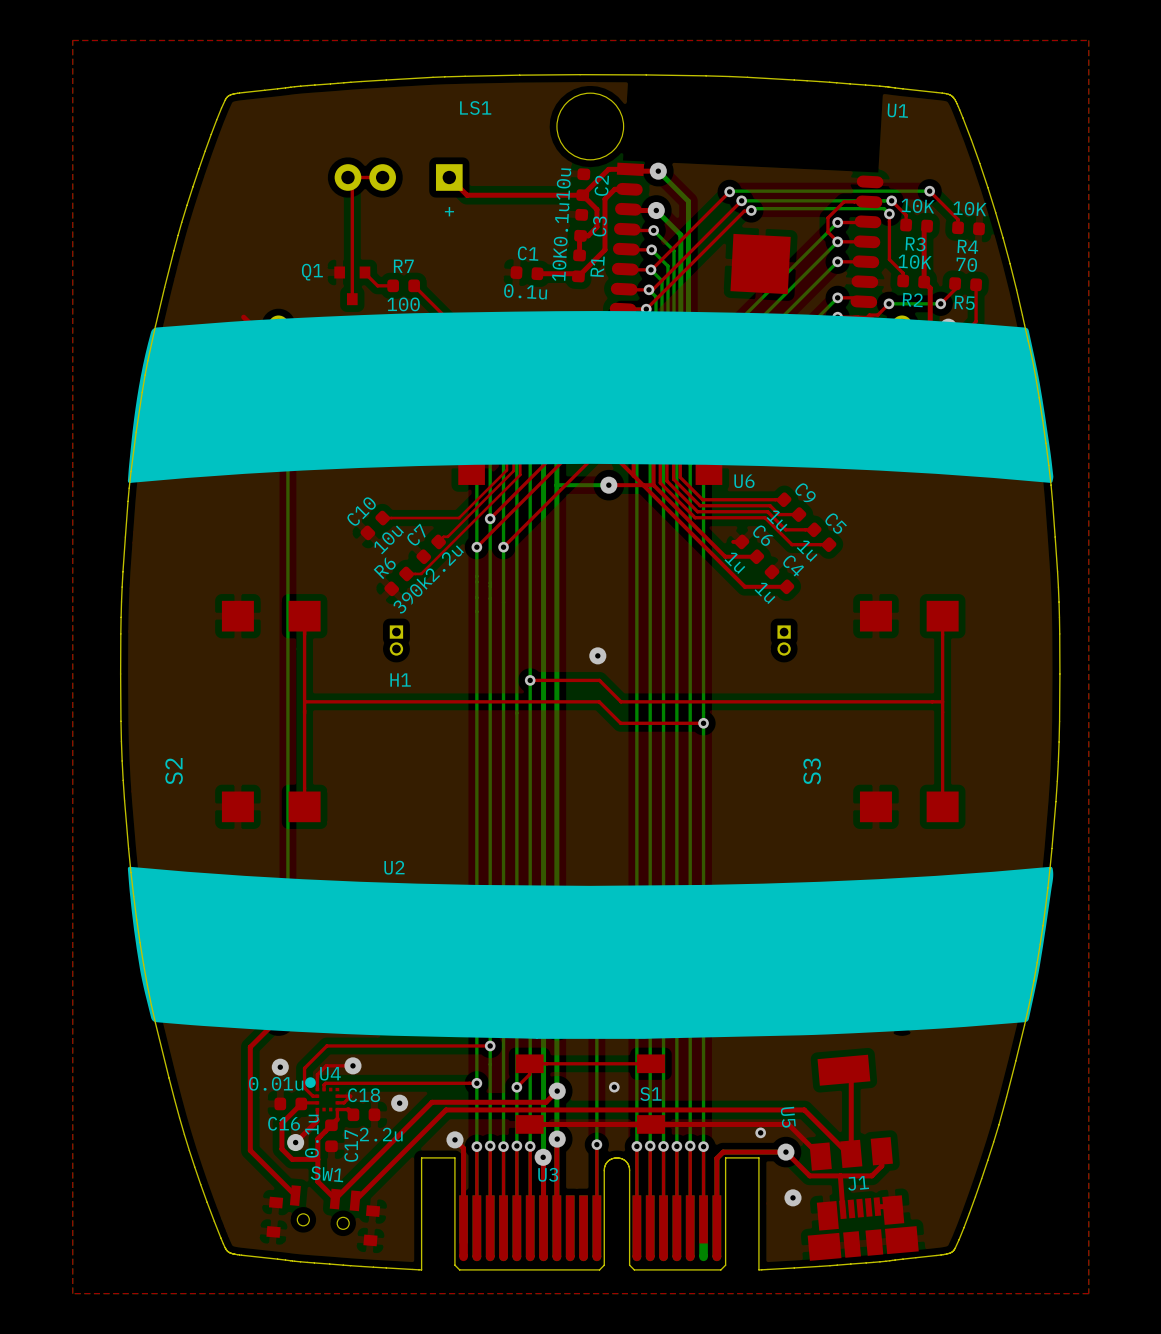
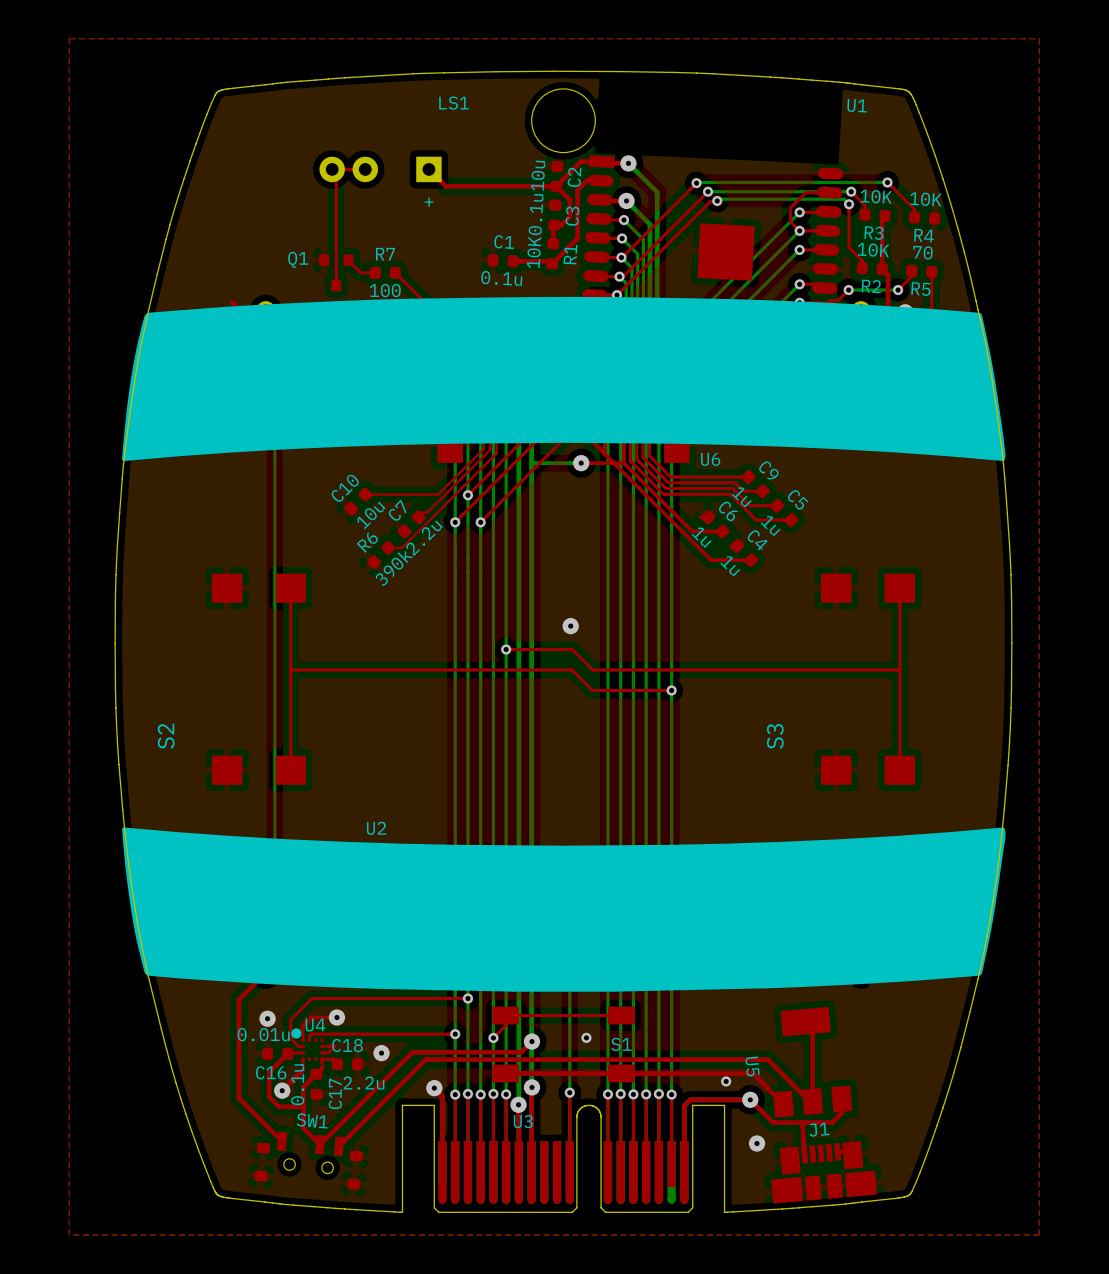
H1: (590, 640) -> none

